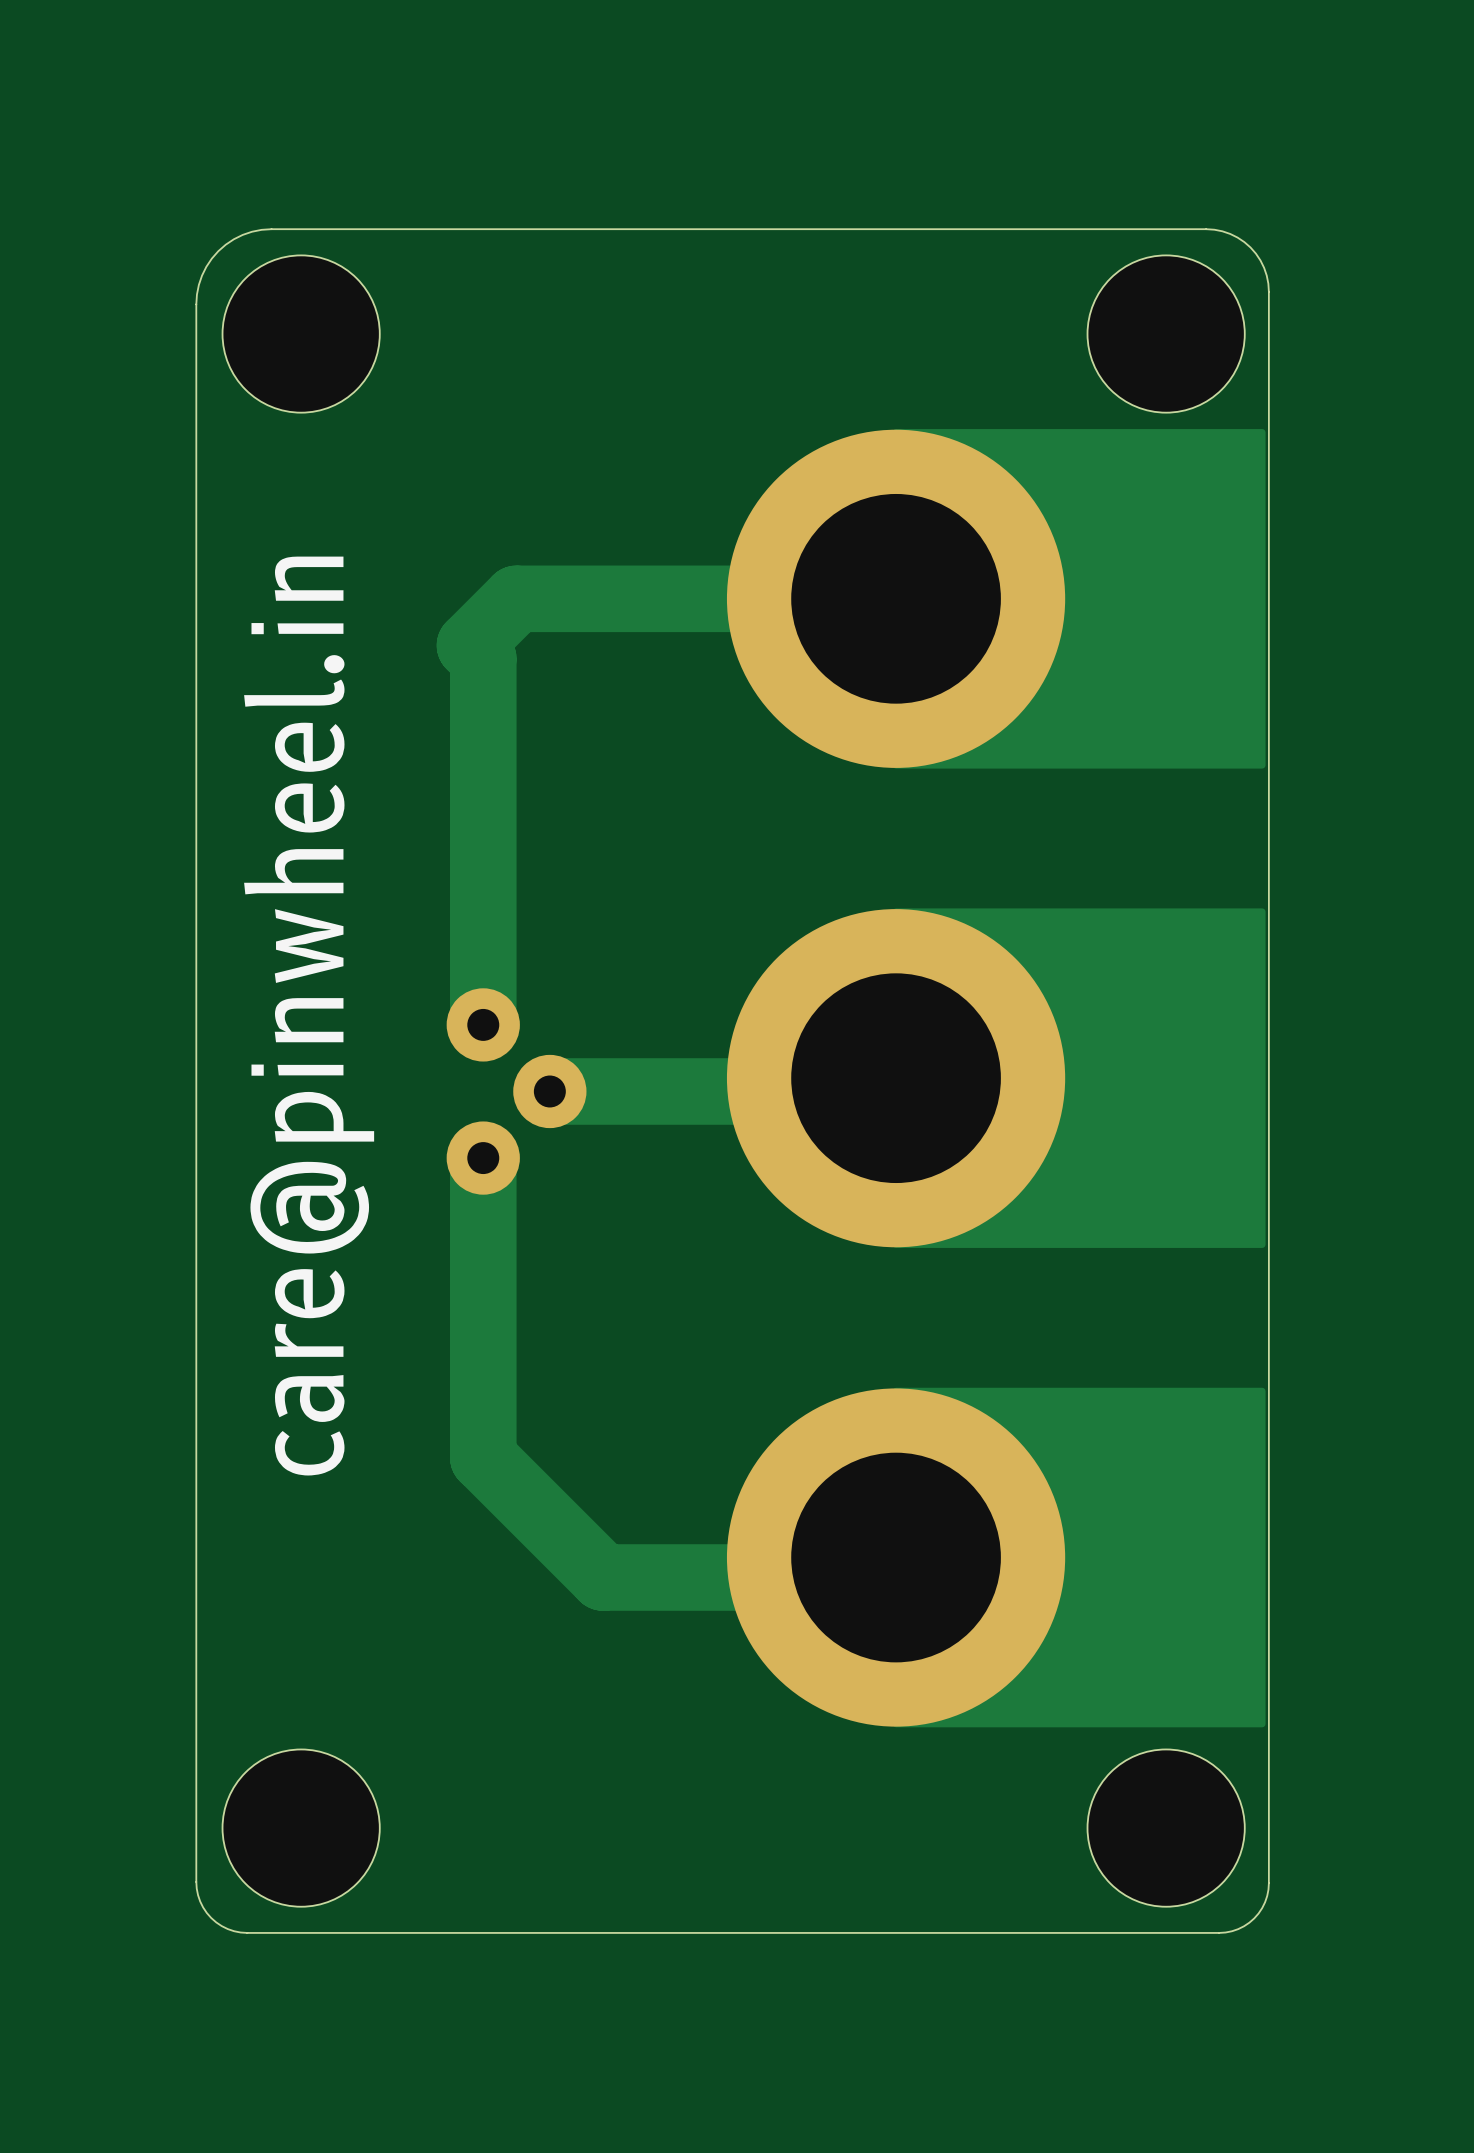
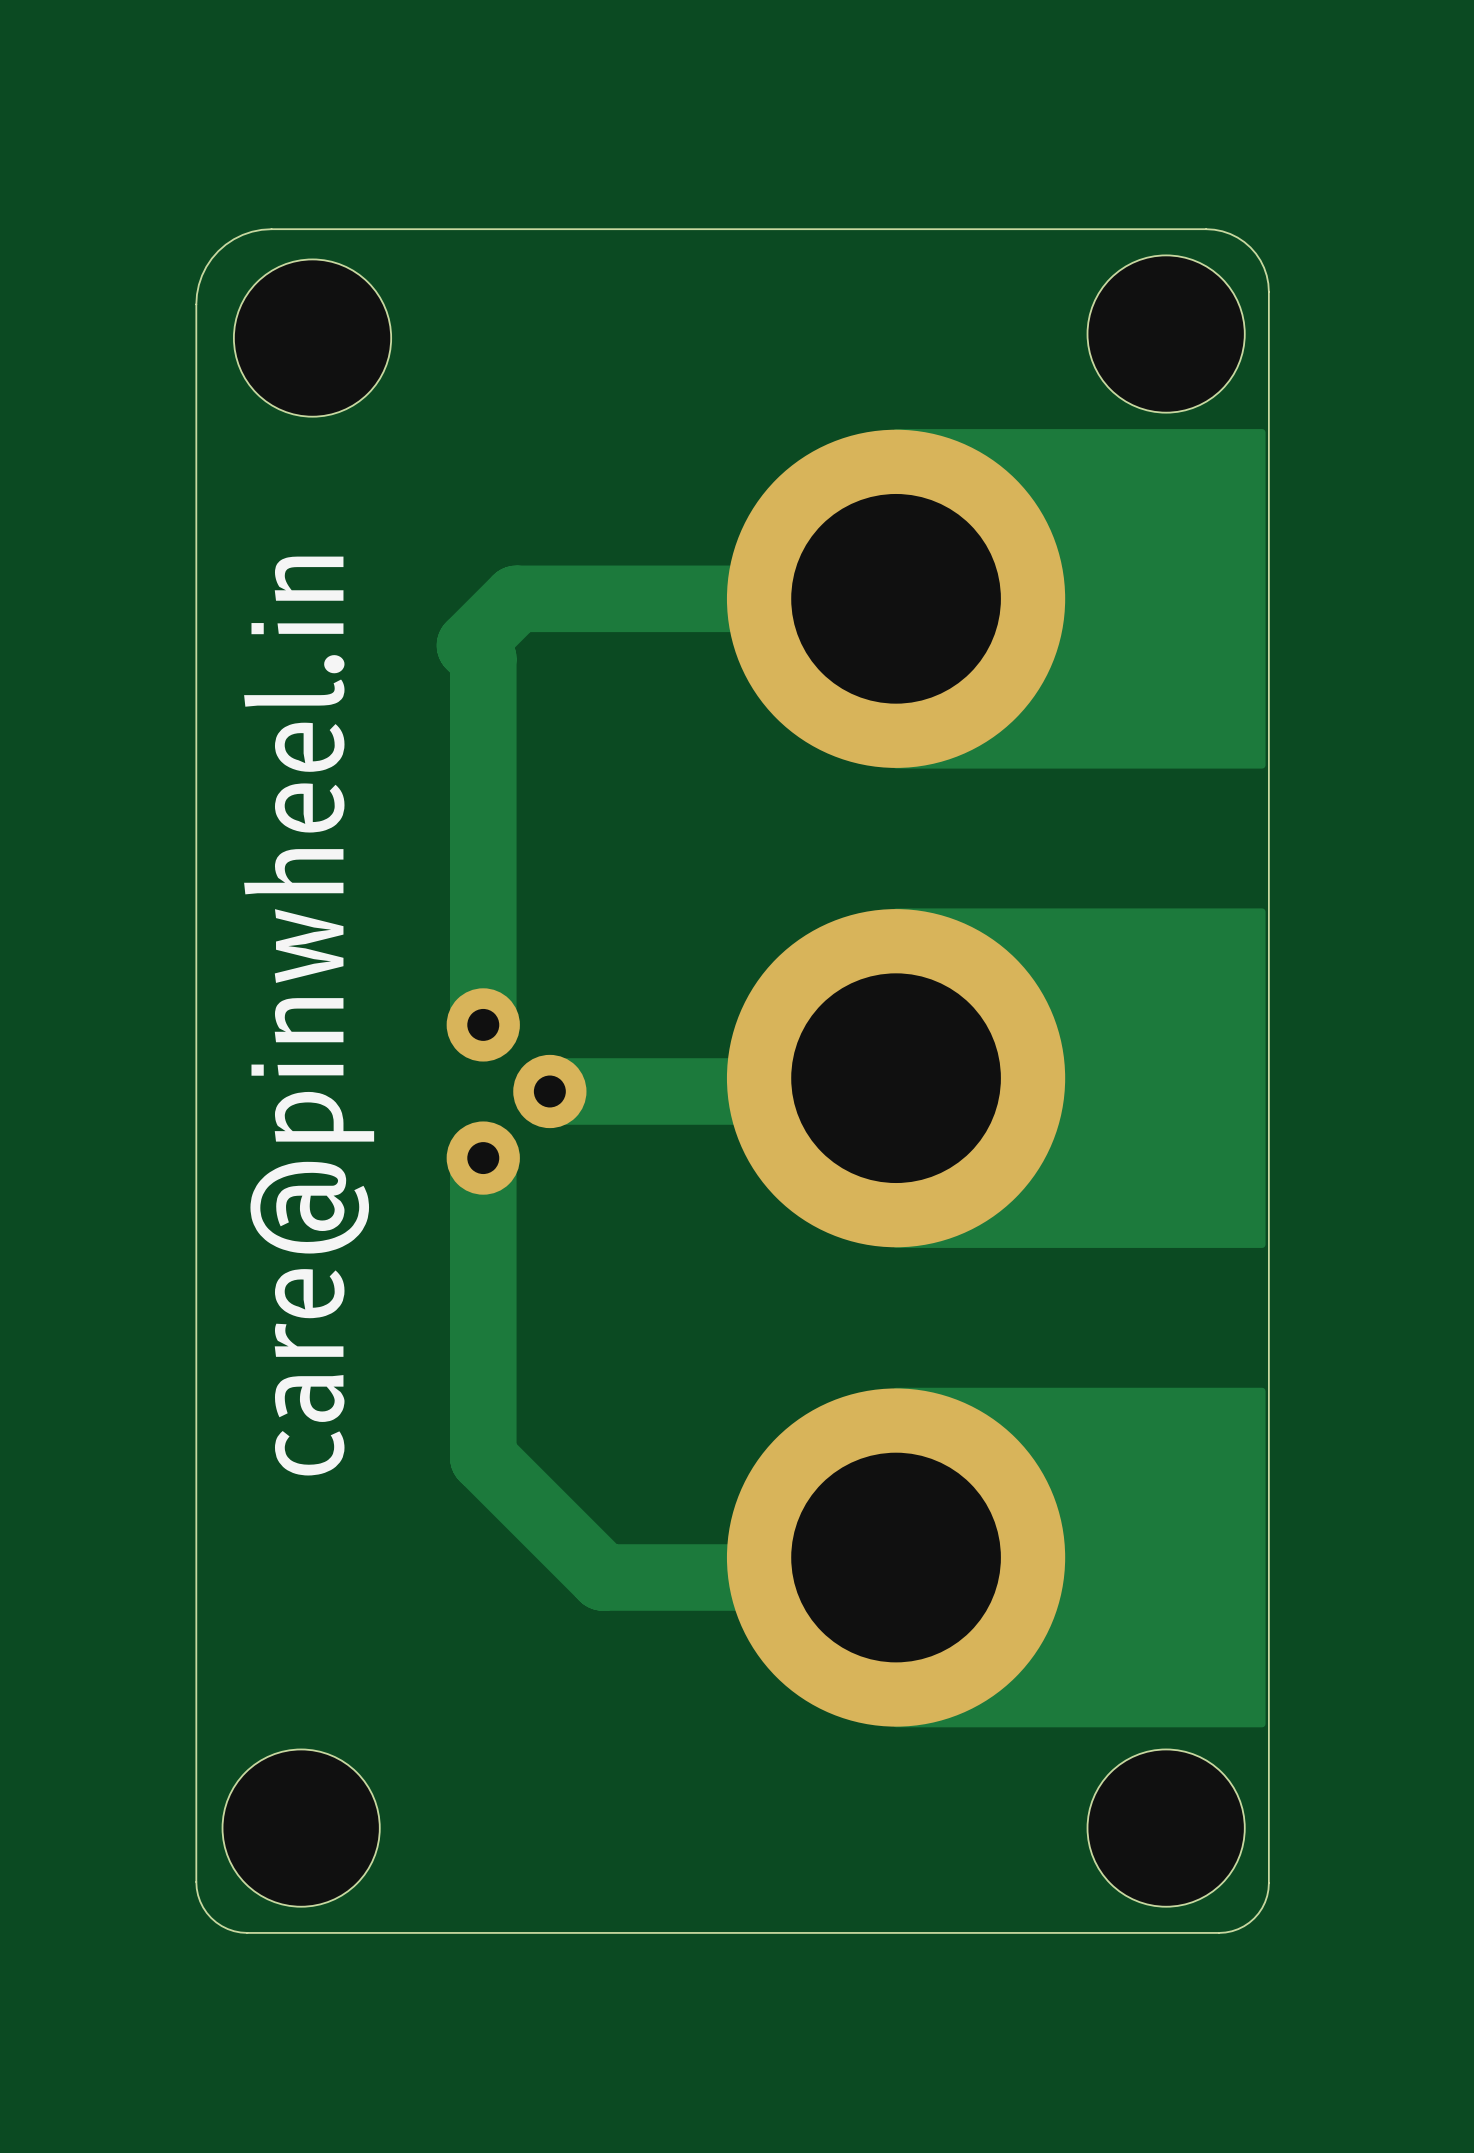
hole position: (301, 334) -> (312, 338)

